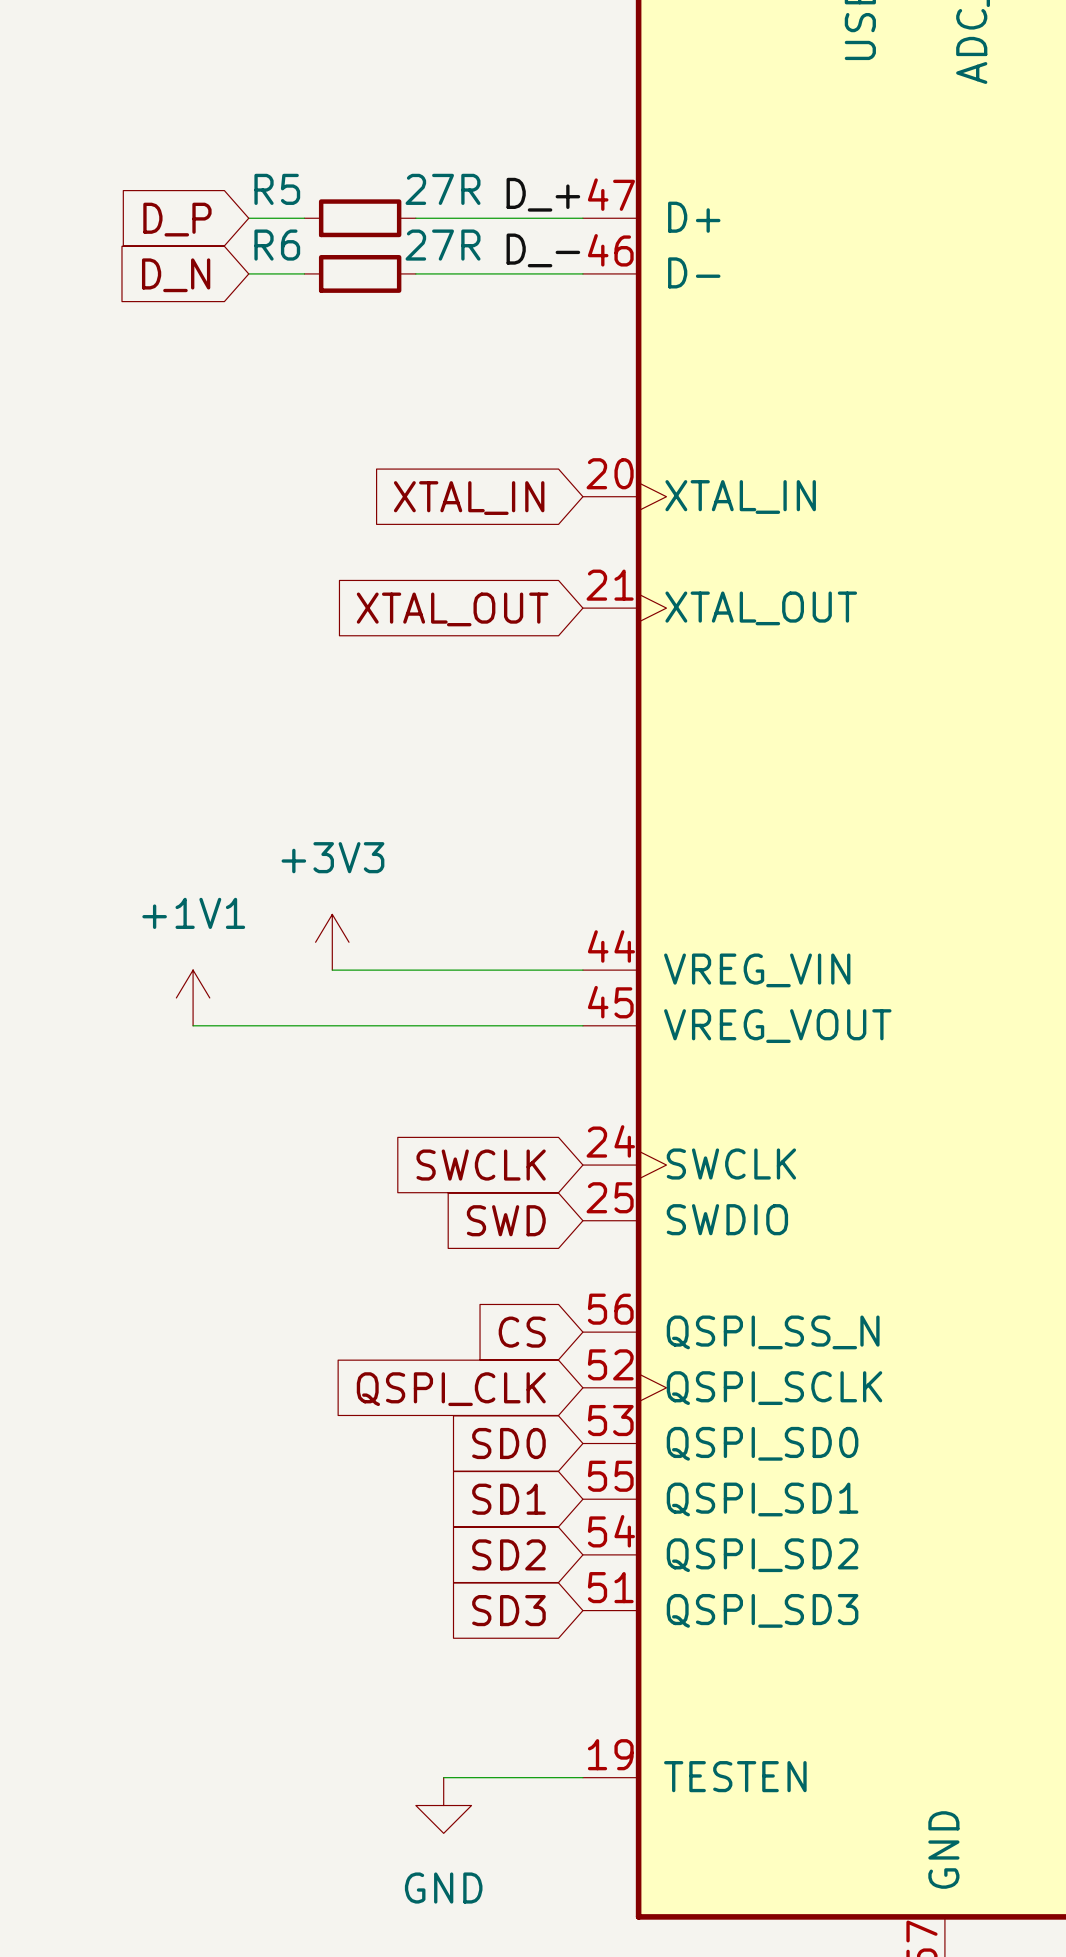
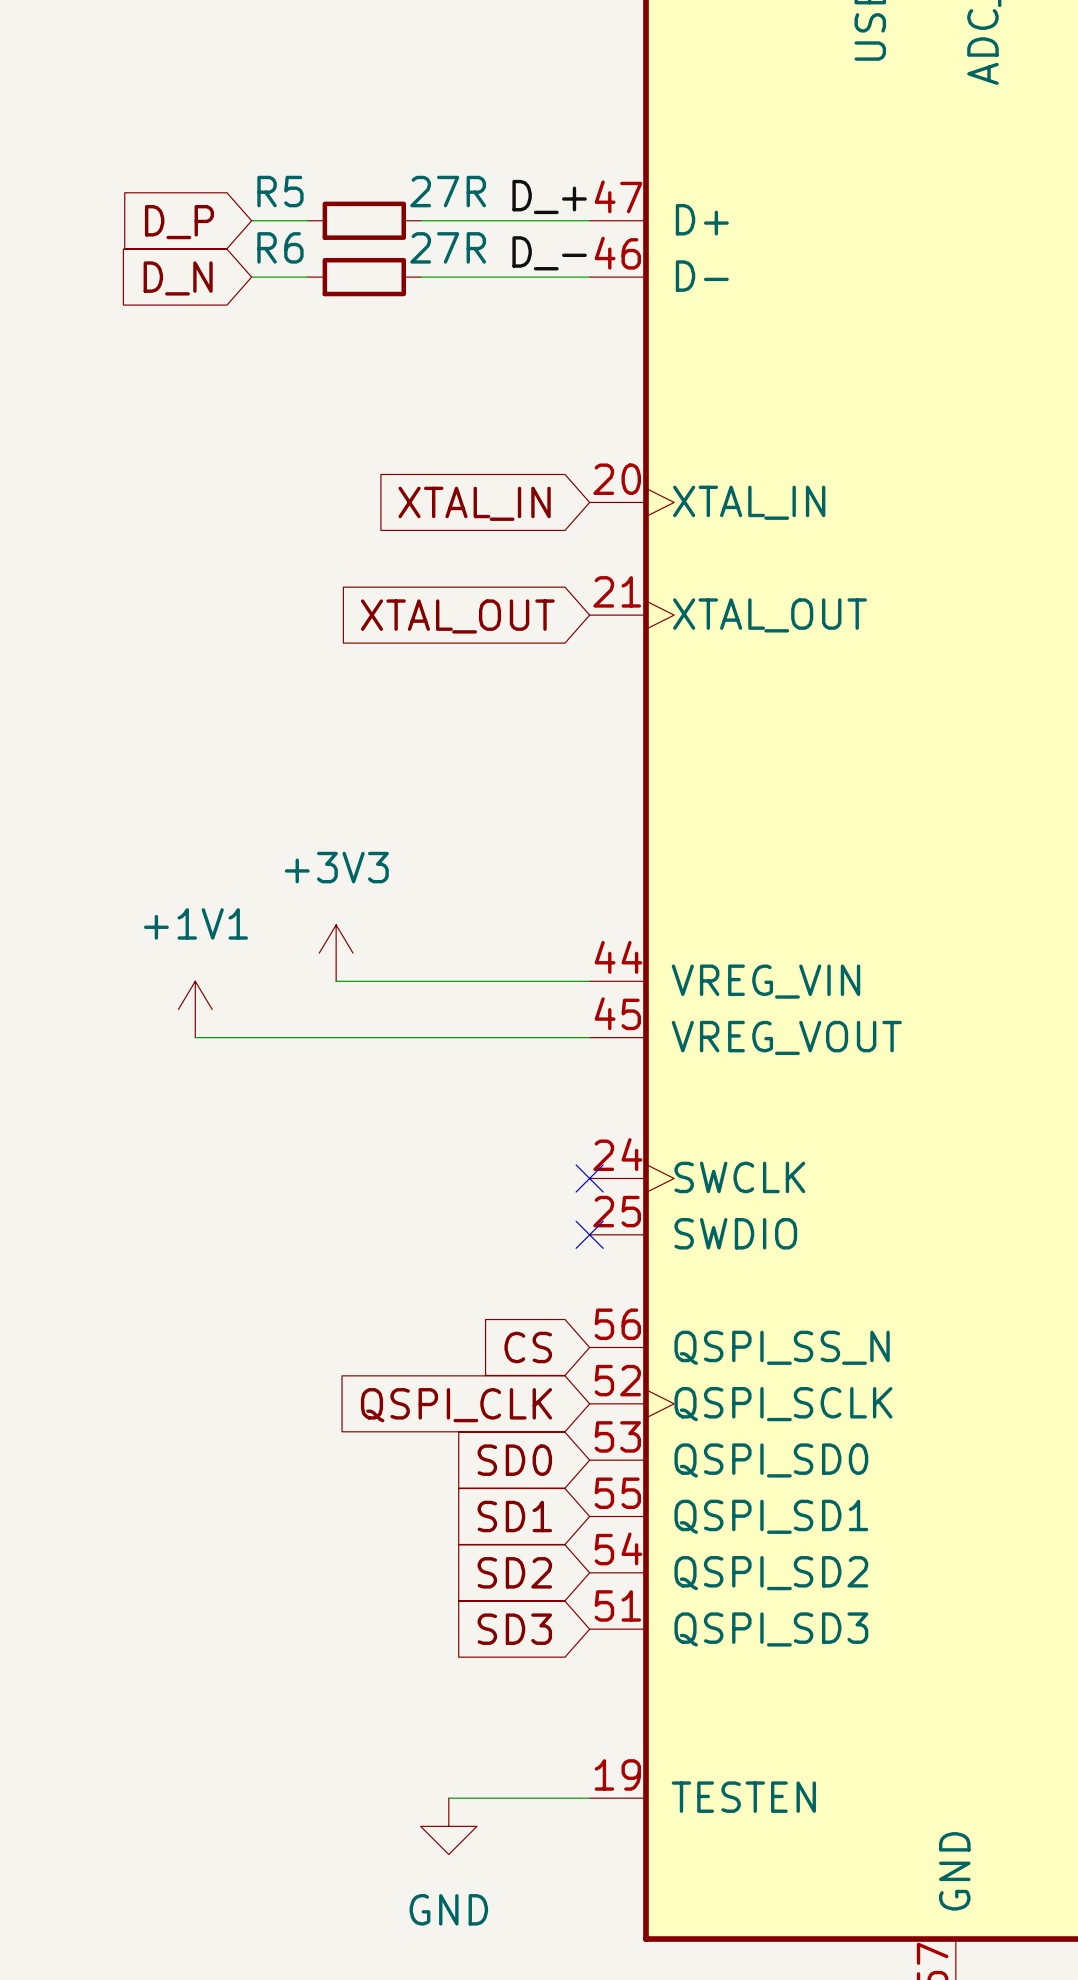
global label: SWCLK (481, 1165) -> none
no-connect mark: none -> (589, 1178)
global label: SWD (506, 1220) -> none
no-connect mark: none -> (589, 1234)

